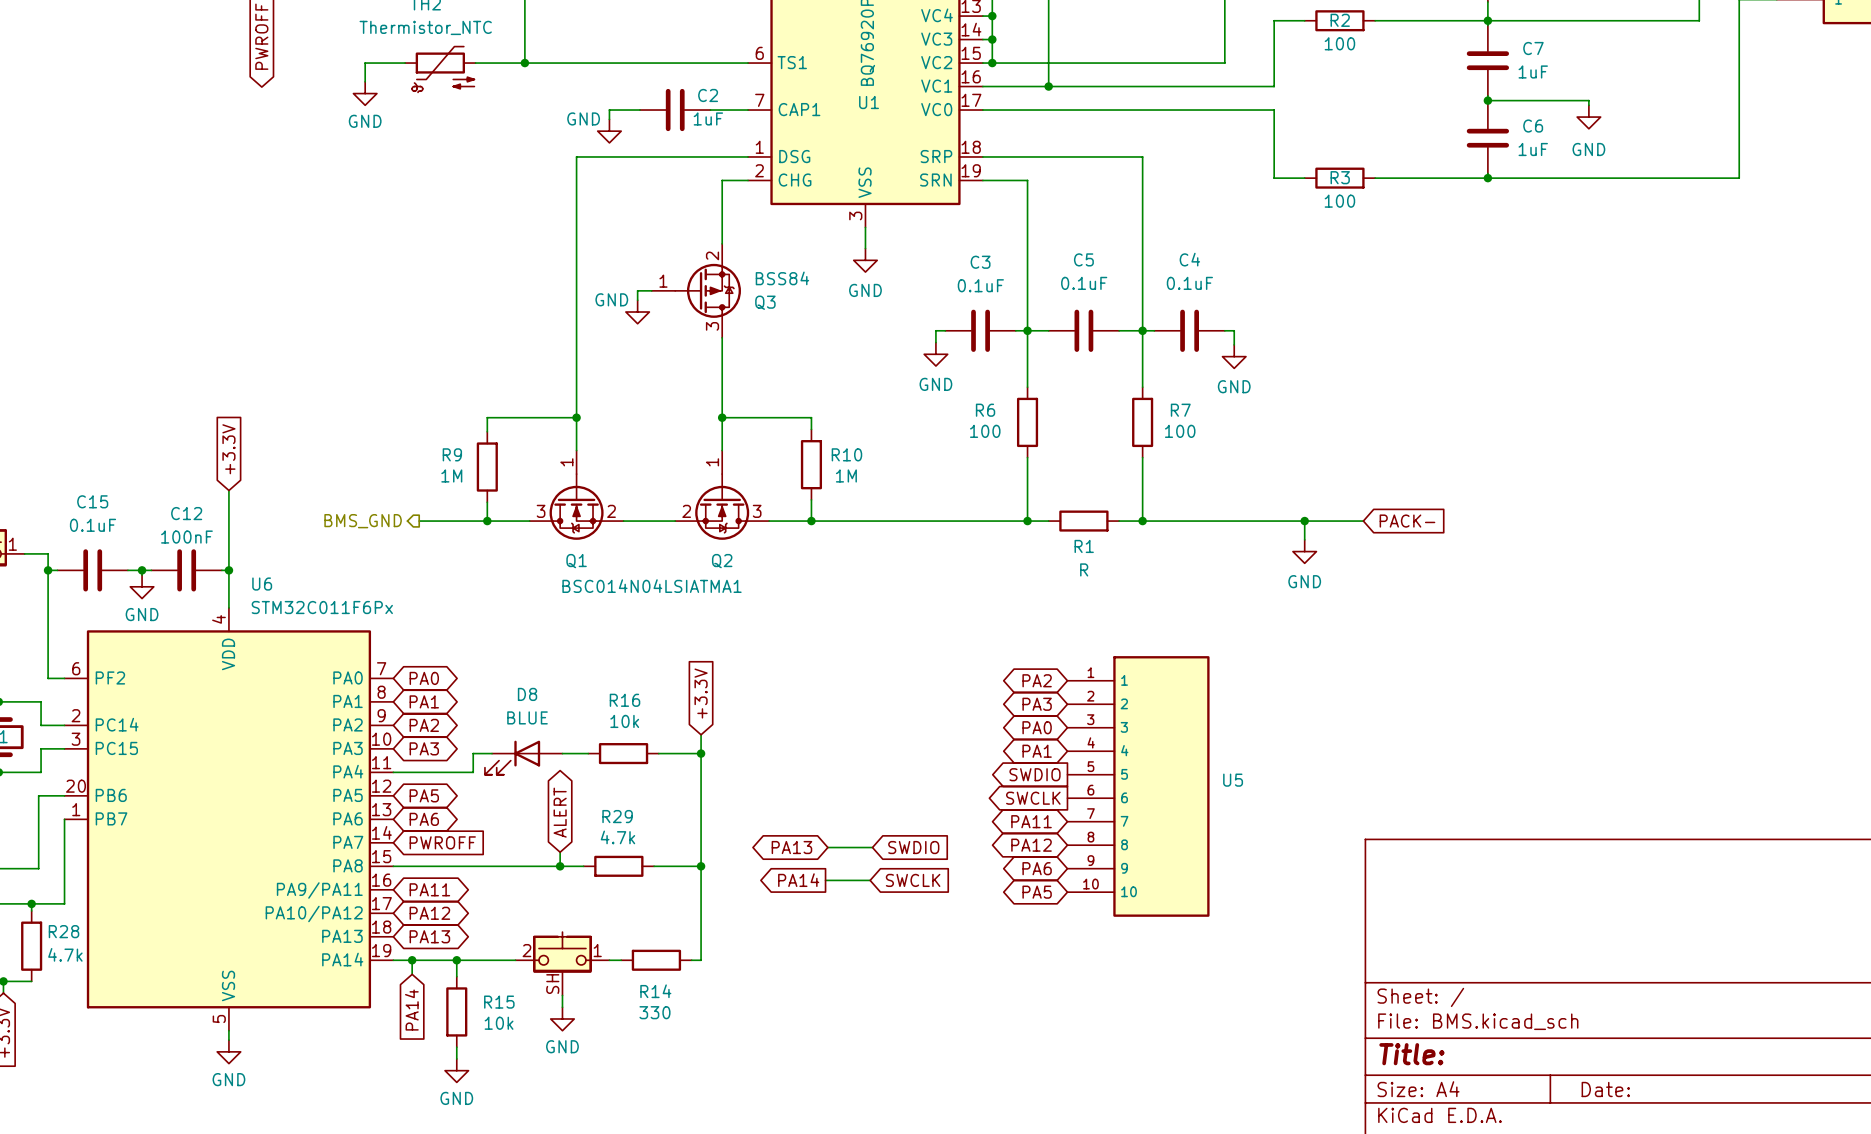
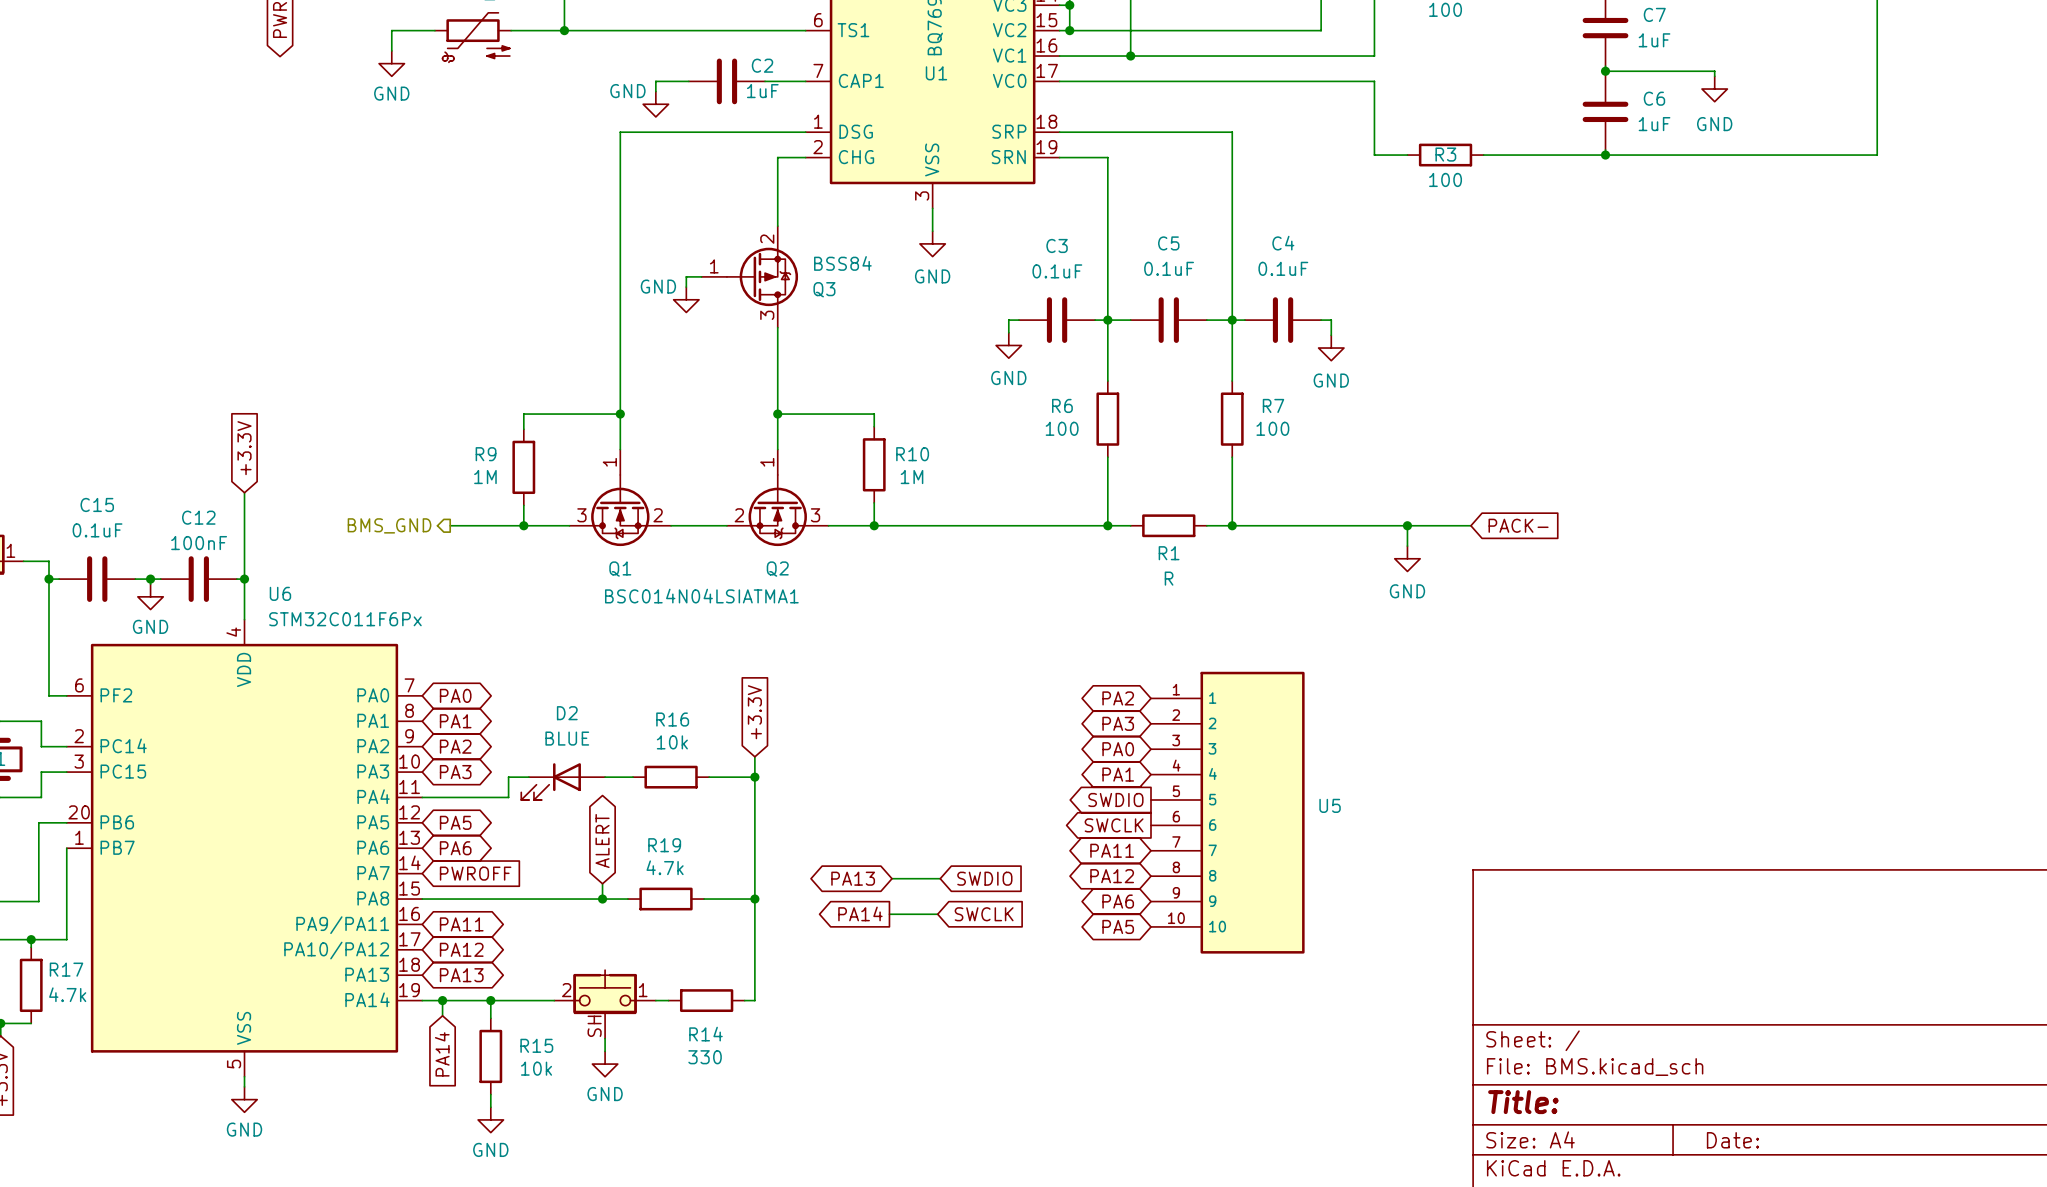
D8 name: D8 (527, 694) -> D2 (567, 713)
R29 name: R29 (617, 816) -> R19 (664, 845)
R28 name: R28 (64, 931) -> R17 (66, 969)

